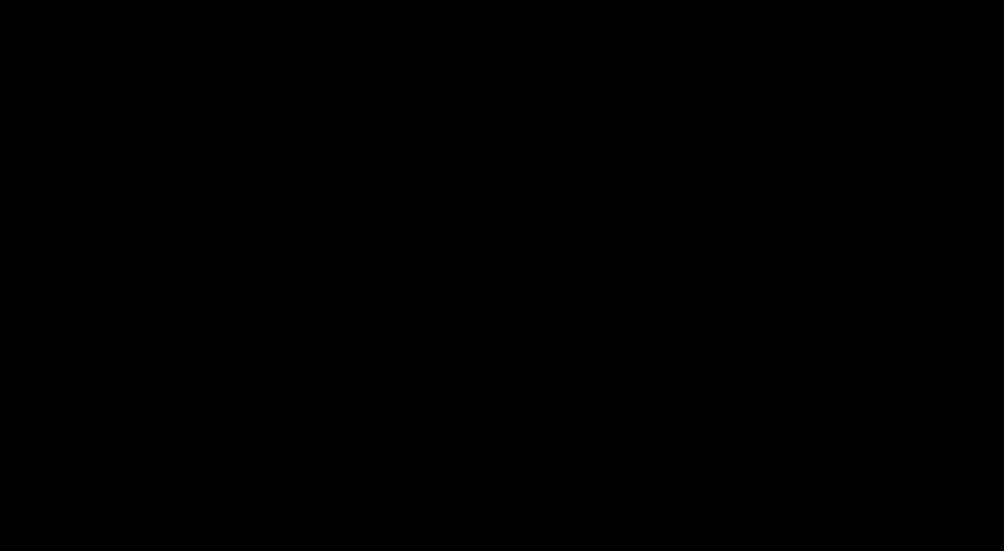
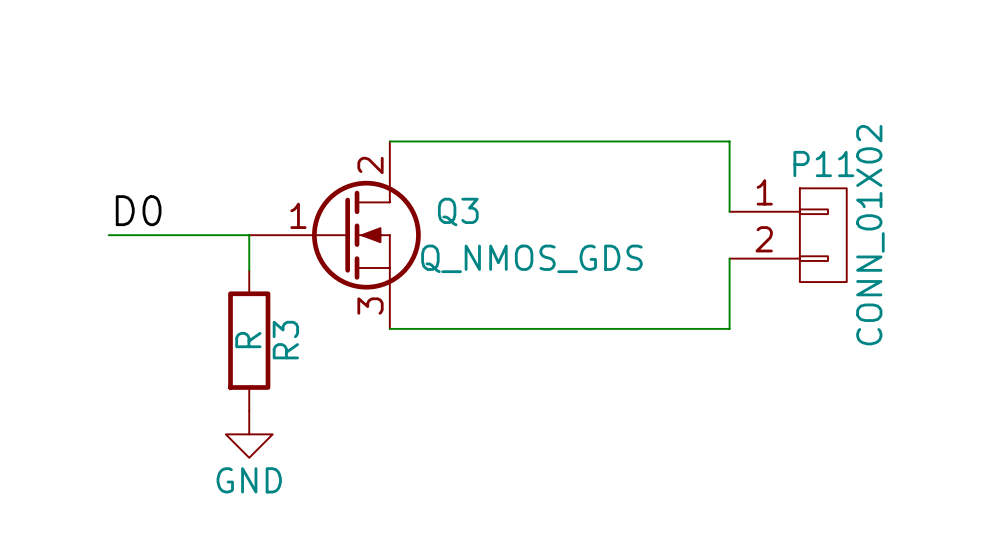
wire: none -> (389, 141) (729, 141) (729, 211)
label: none -> D0 (138, 210)
wire: none -> (108, 235) (249, 235) (249, 270)
Q3: none -> Q_NMOS_GDS (335, 235)
P11: none -> CONN_01X02 (788, 235)
wire: none -> (729, 258) (729, 328) (389, 328)
R3: none -> R (249, 340)
power symbol: none -> GND (249, 434)

